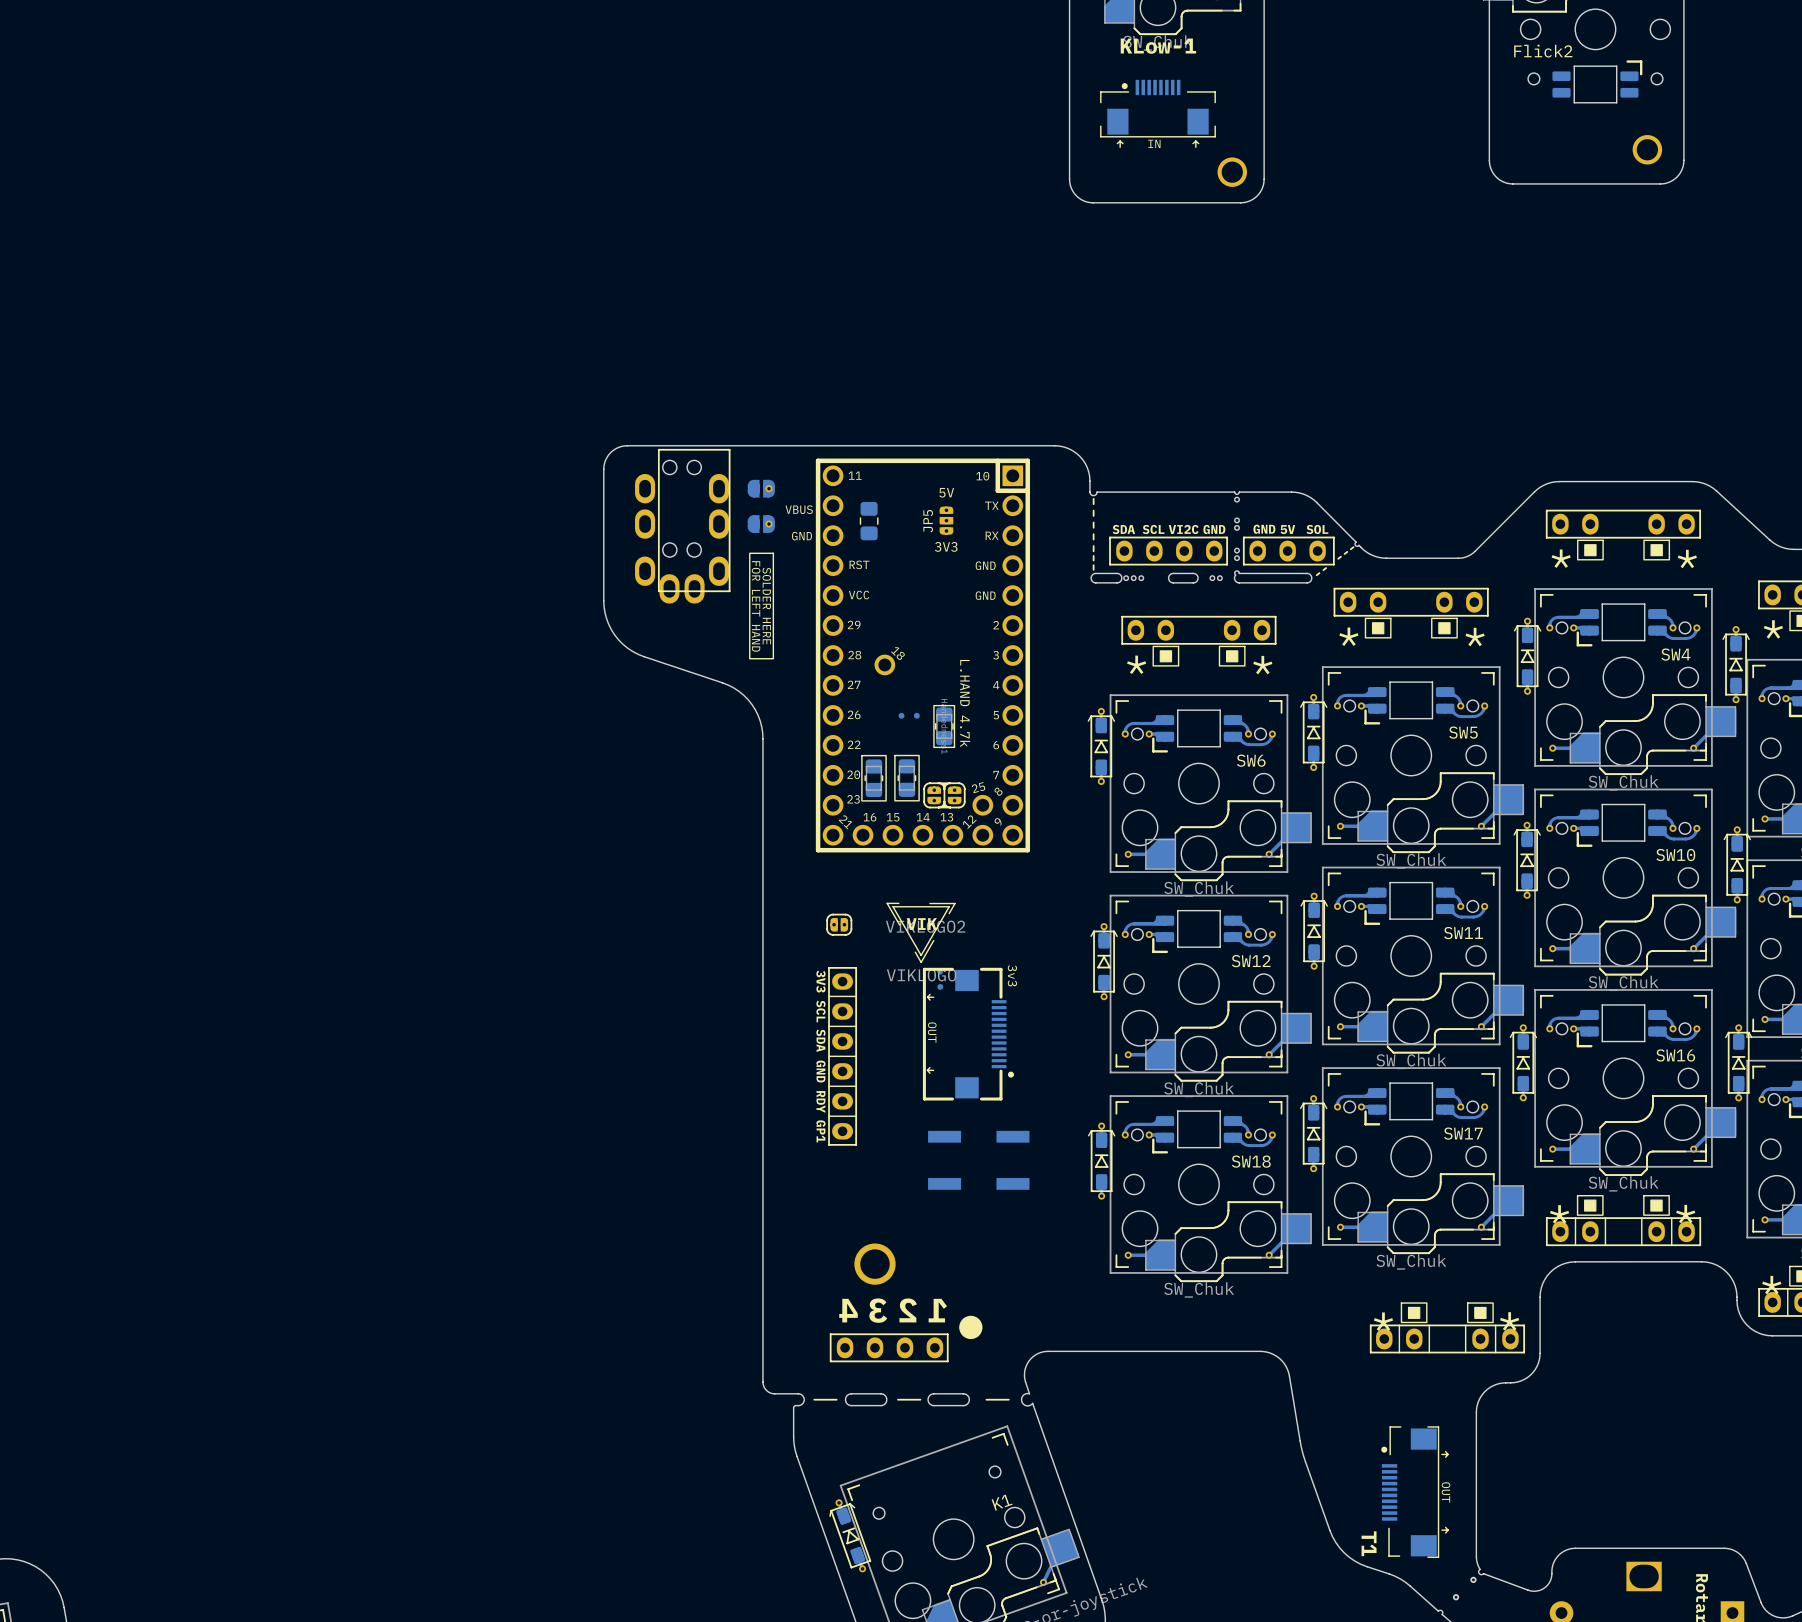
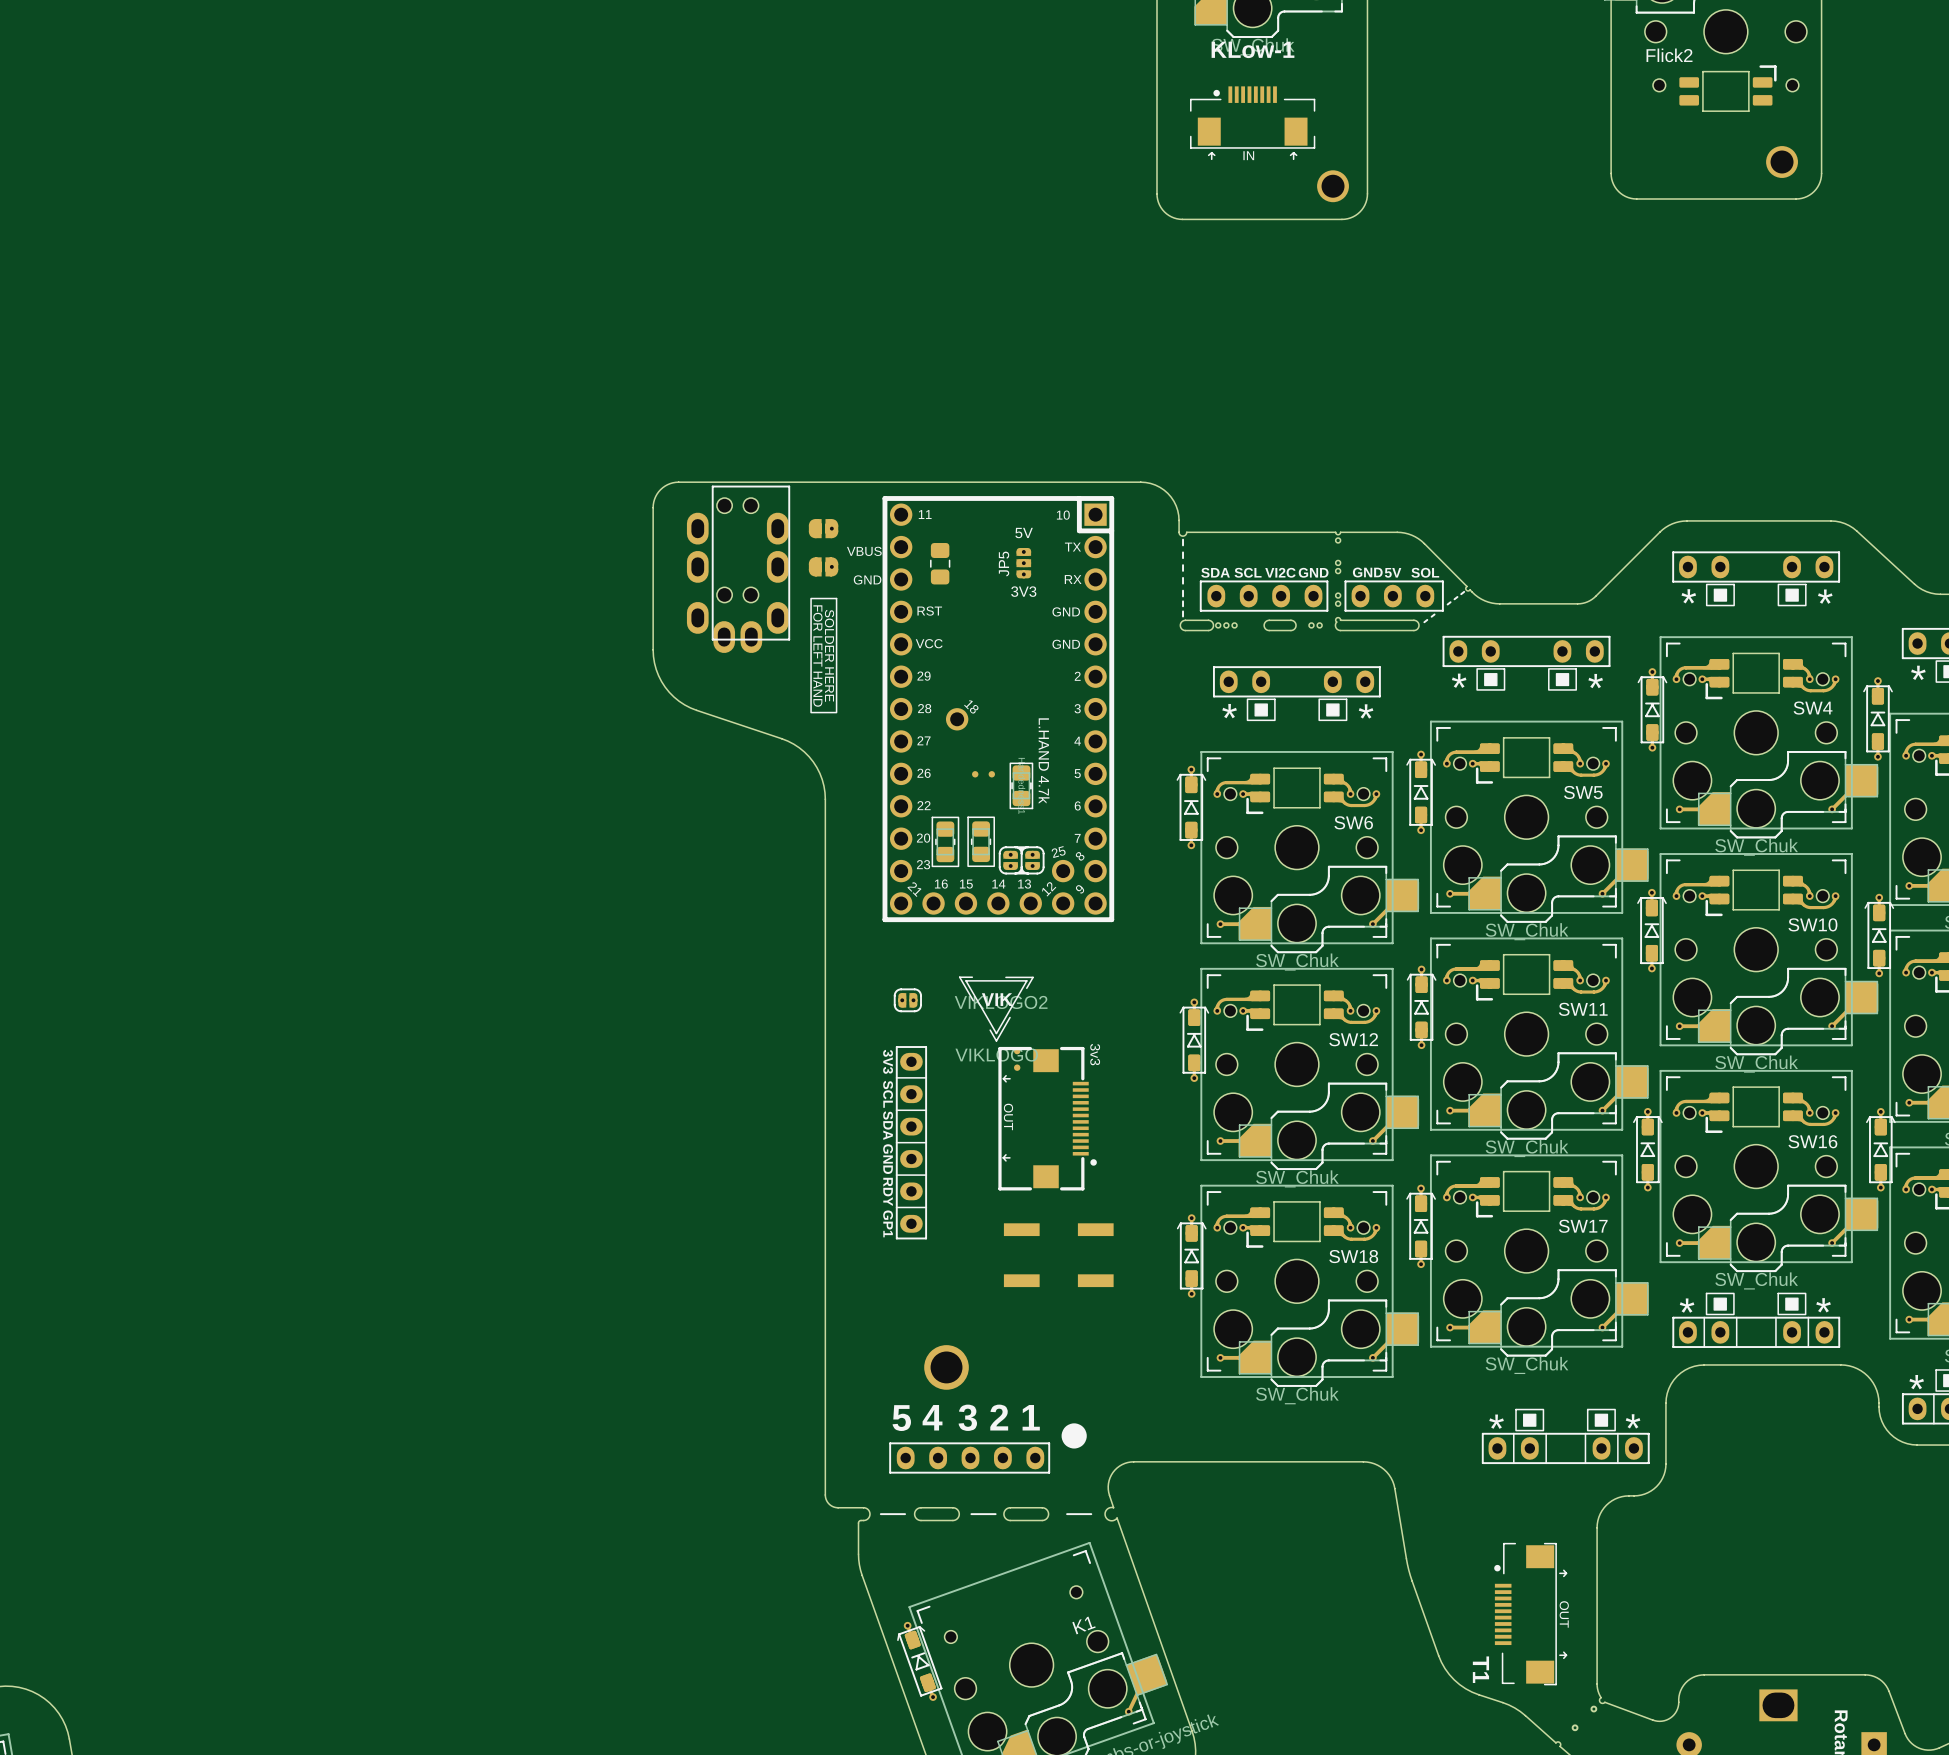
part footprint: [829, 1315, 983, 1363] -> [889, 1423, 1087, 1474]

